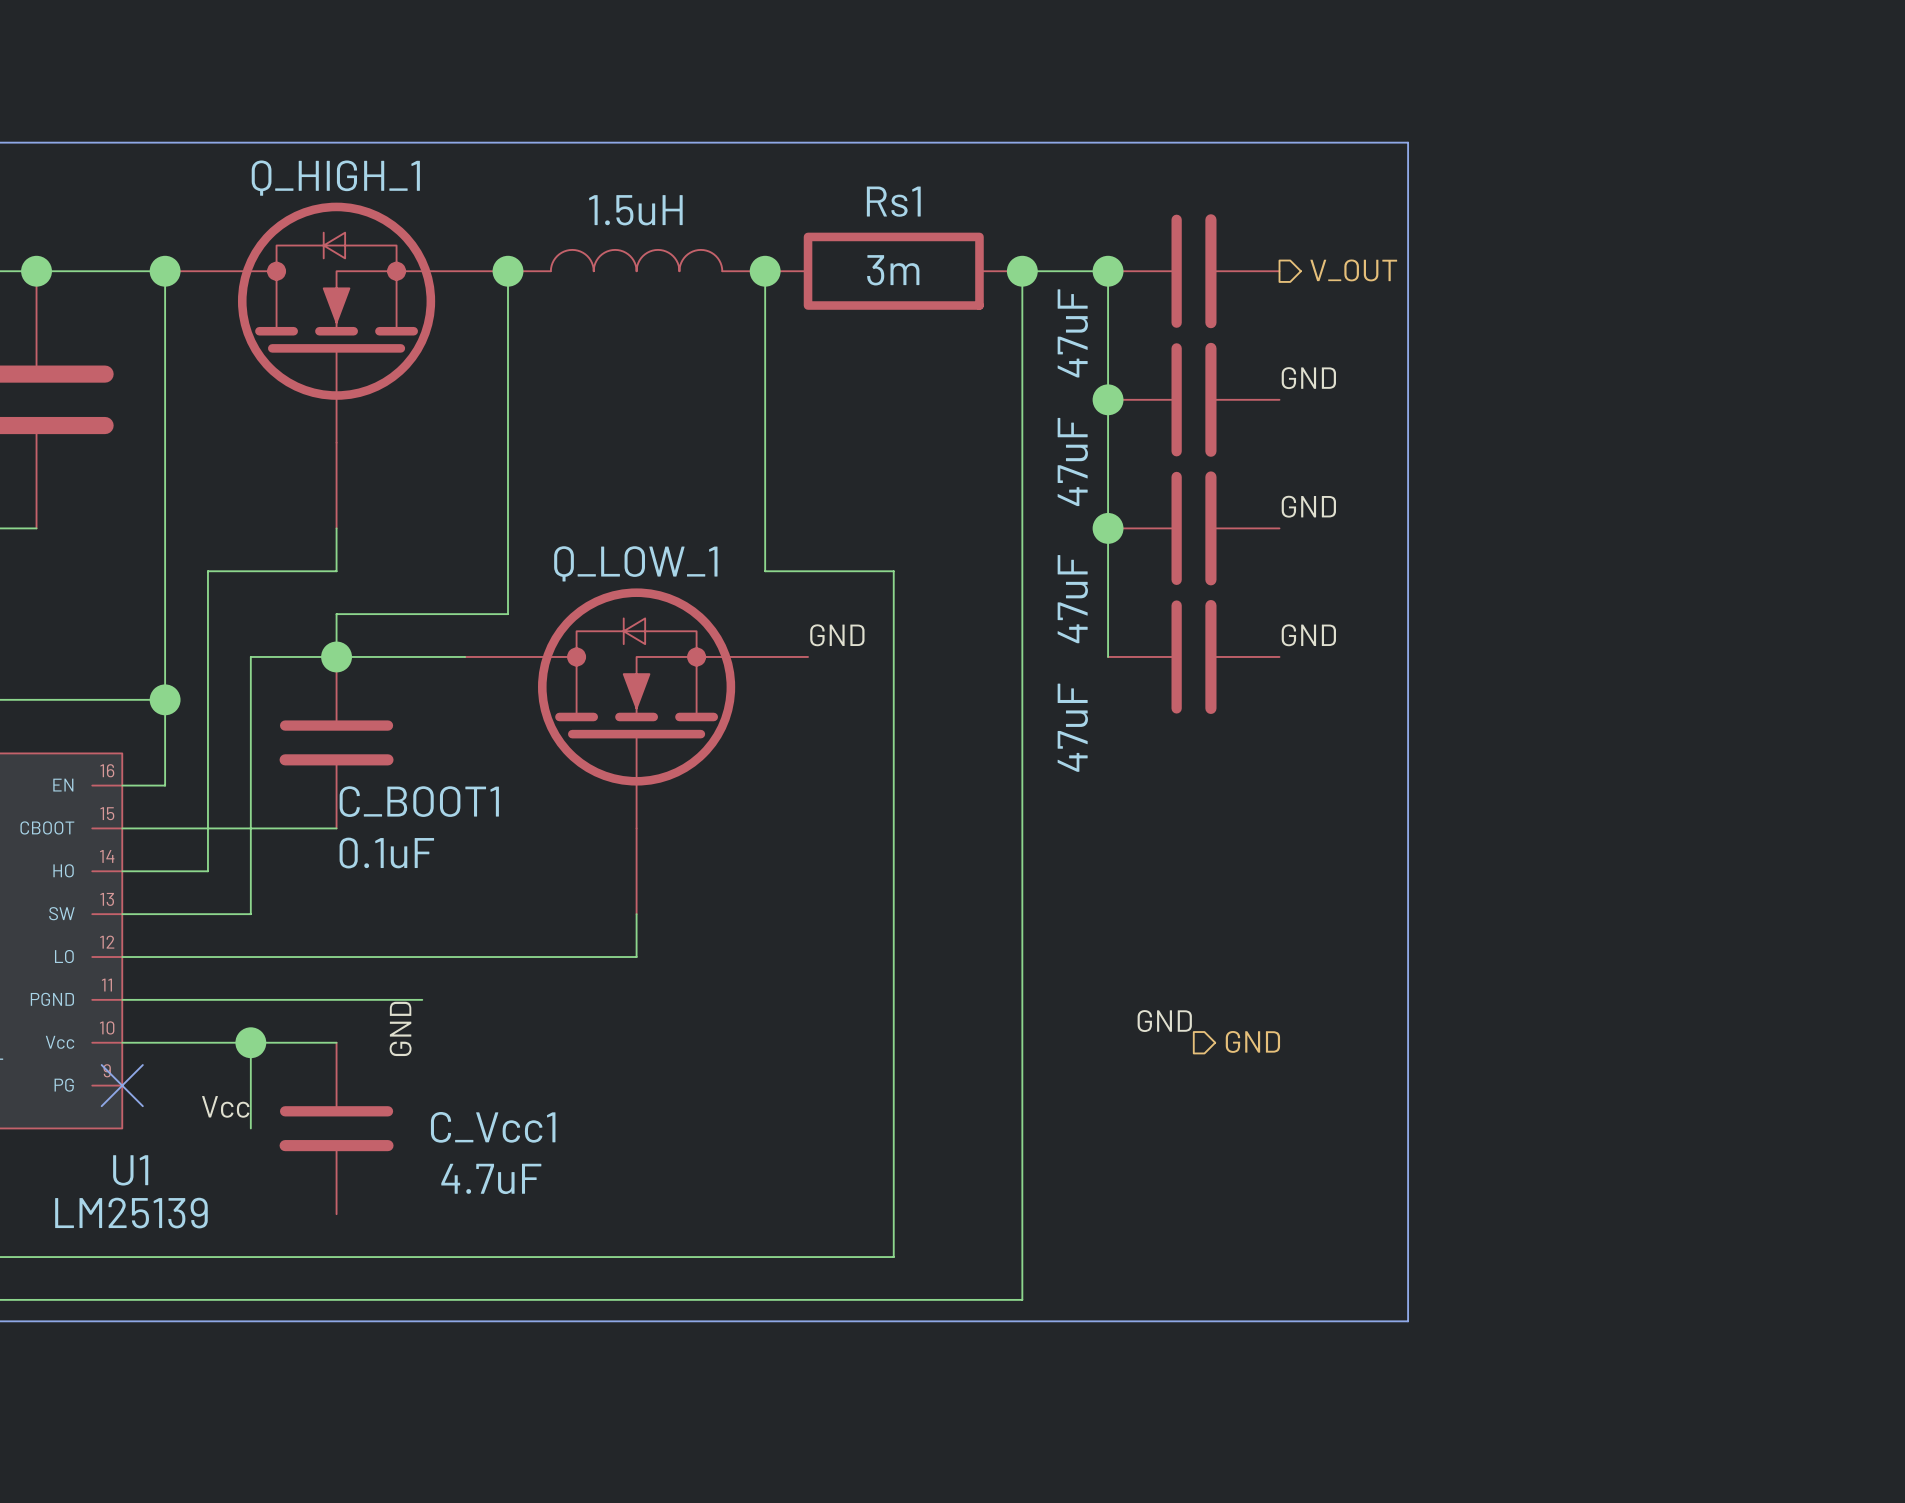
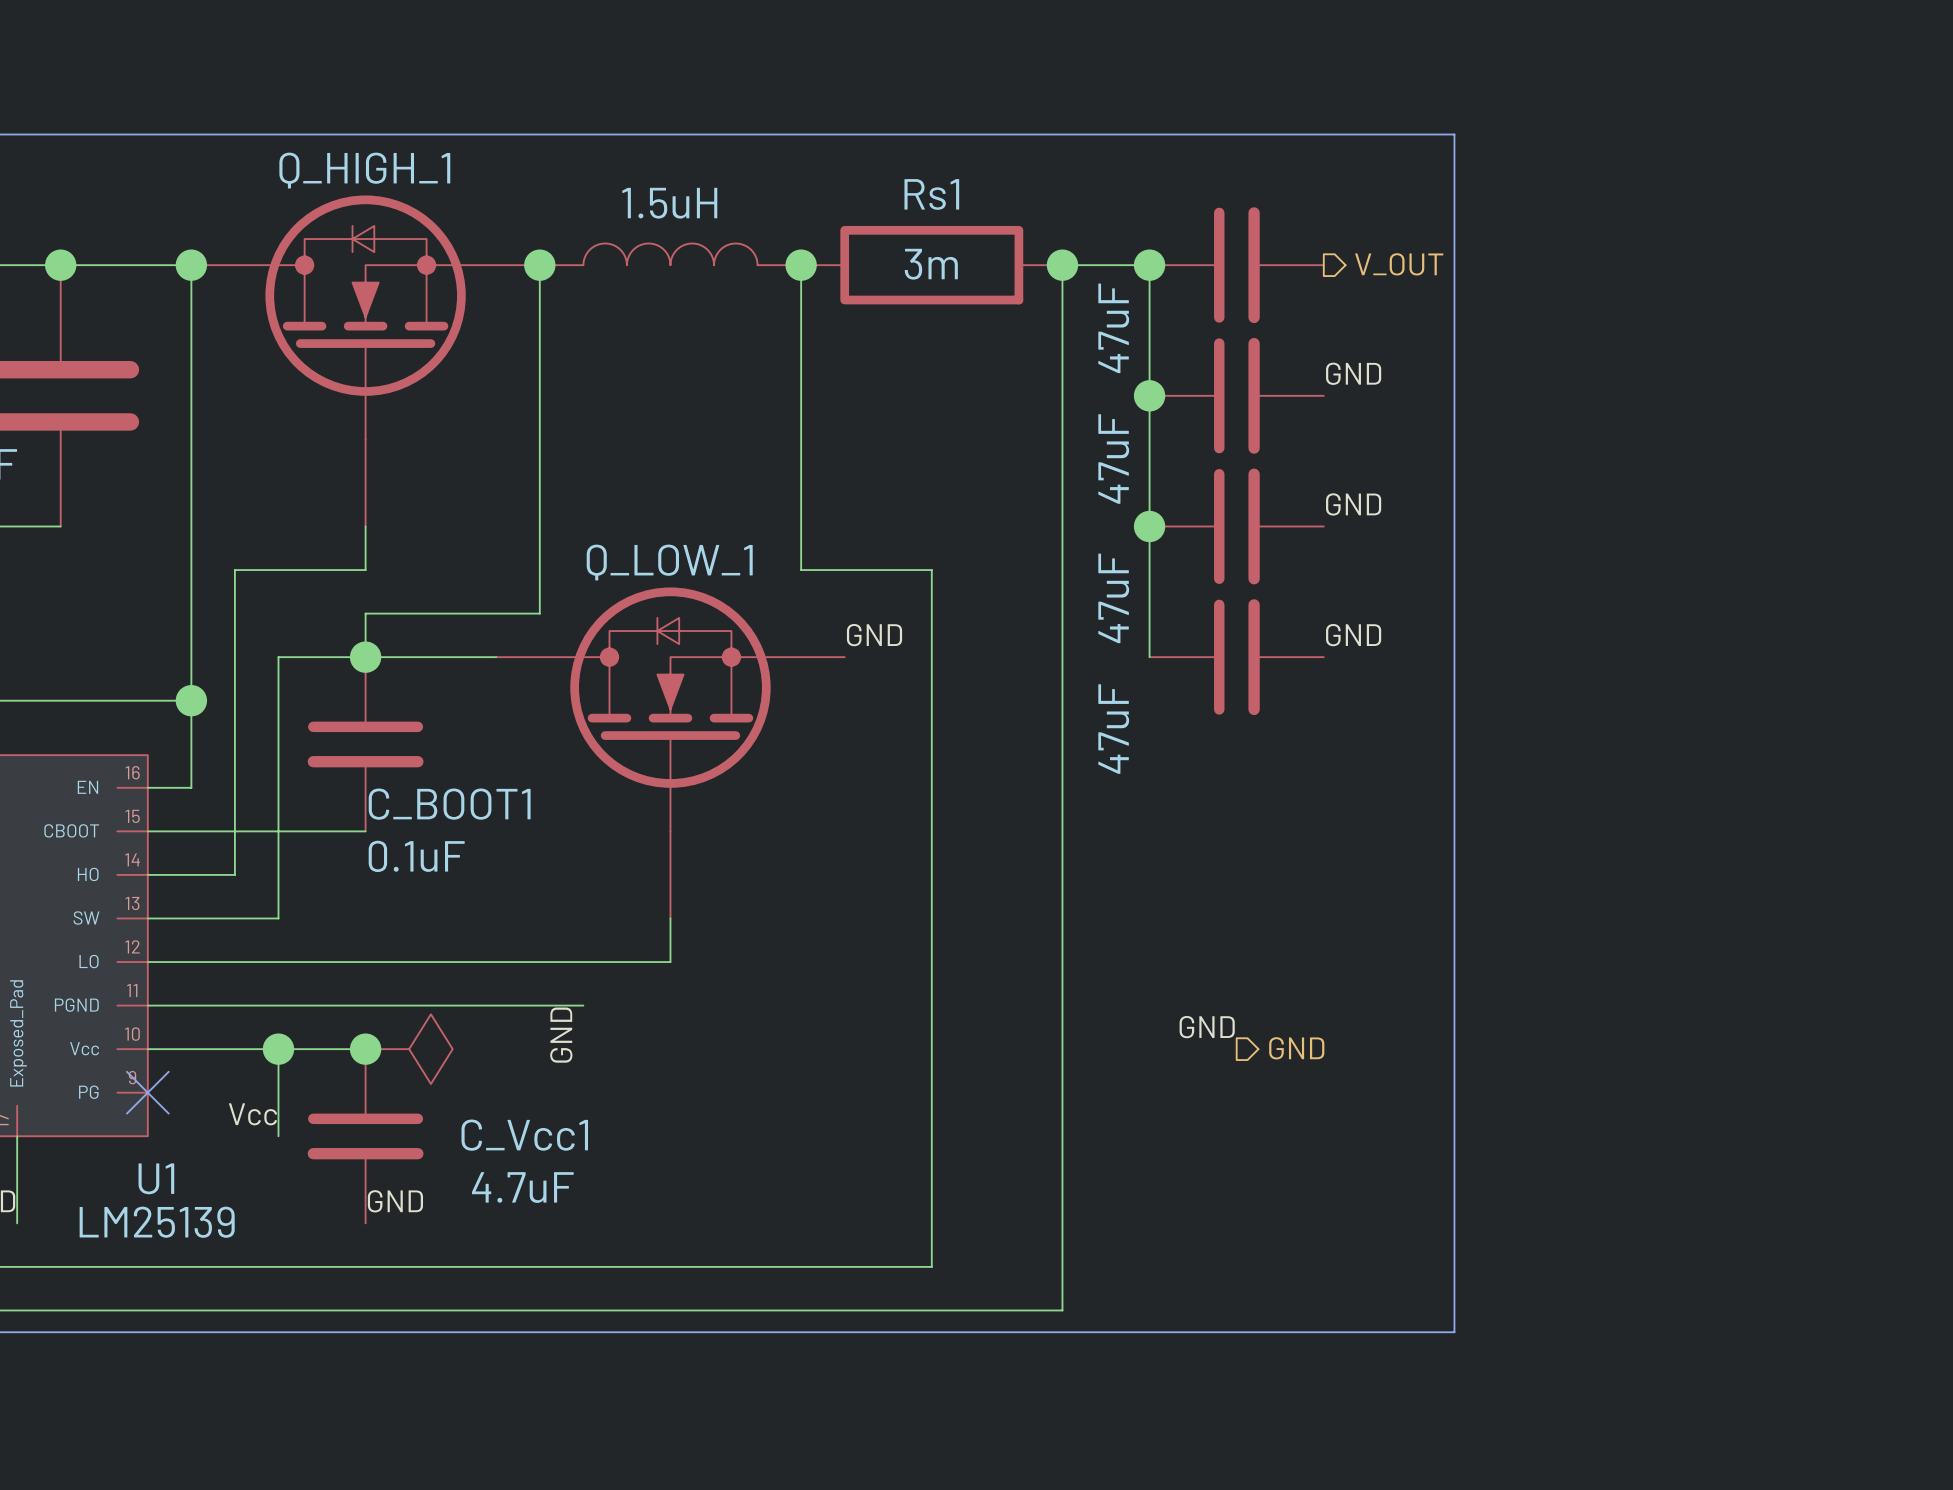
wire: none -> (452, 1005) (583, 1005)
label: GND (400, 1028) -> none
label: none -> GND (561, 1035)
junction: none -> (365, 1049)
power symbol: none -> (409, 1049)
label: none -> GND (395, 1201)

